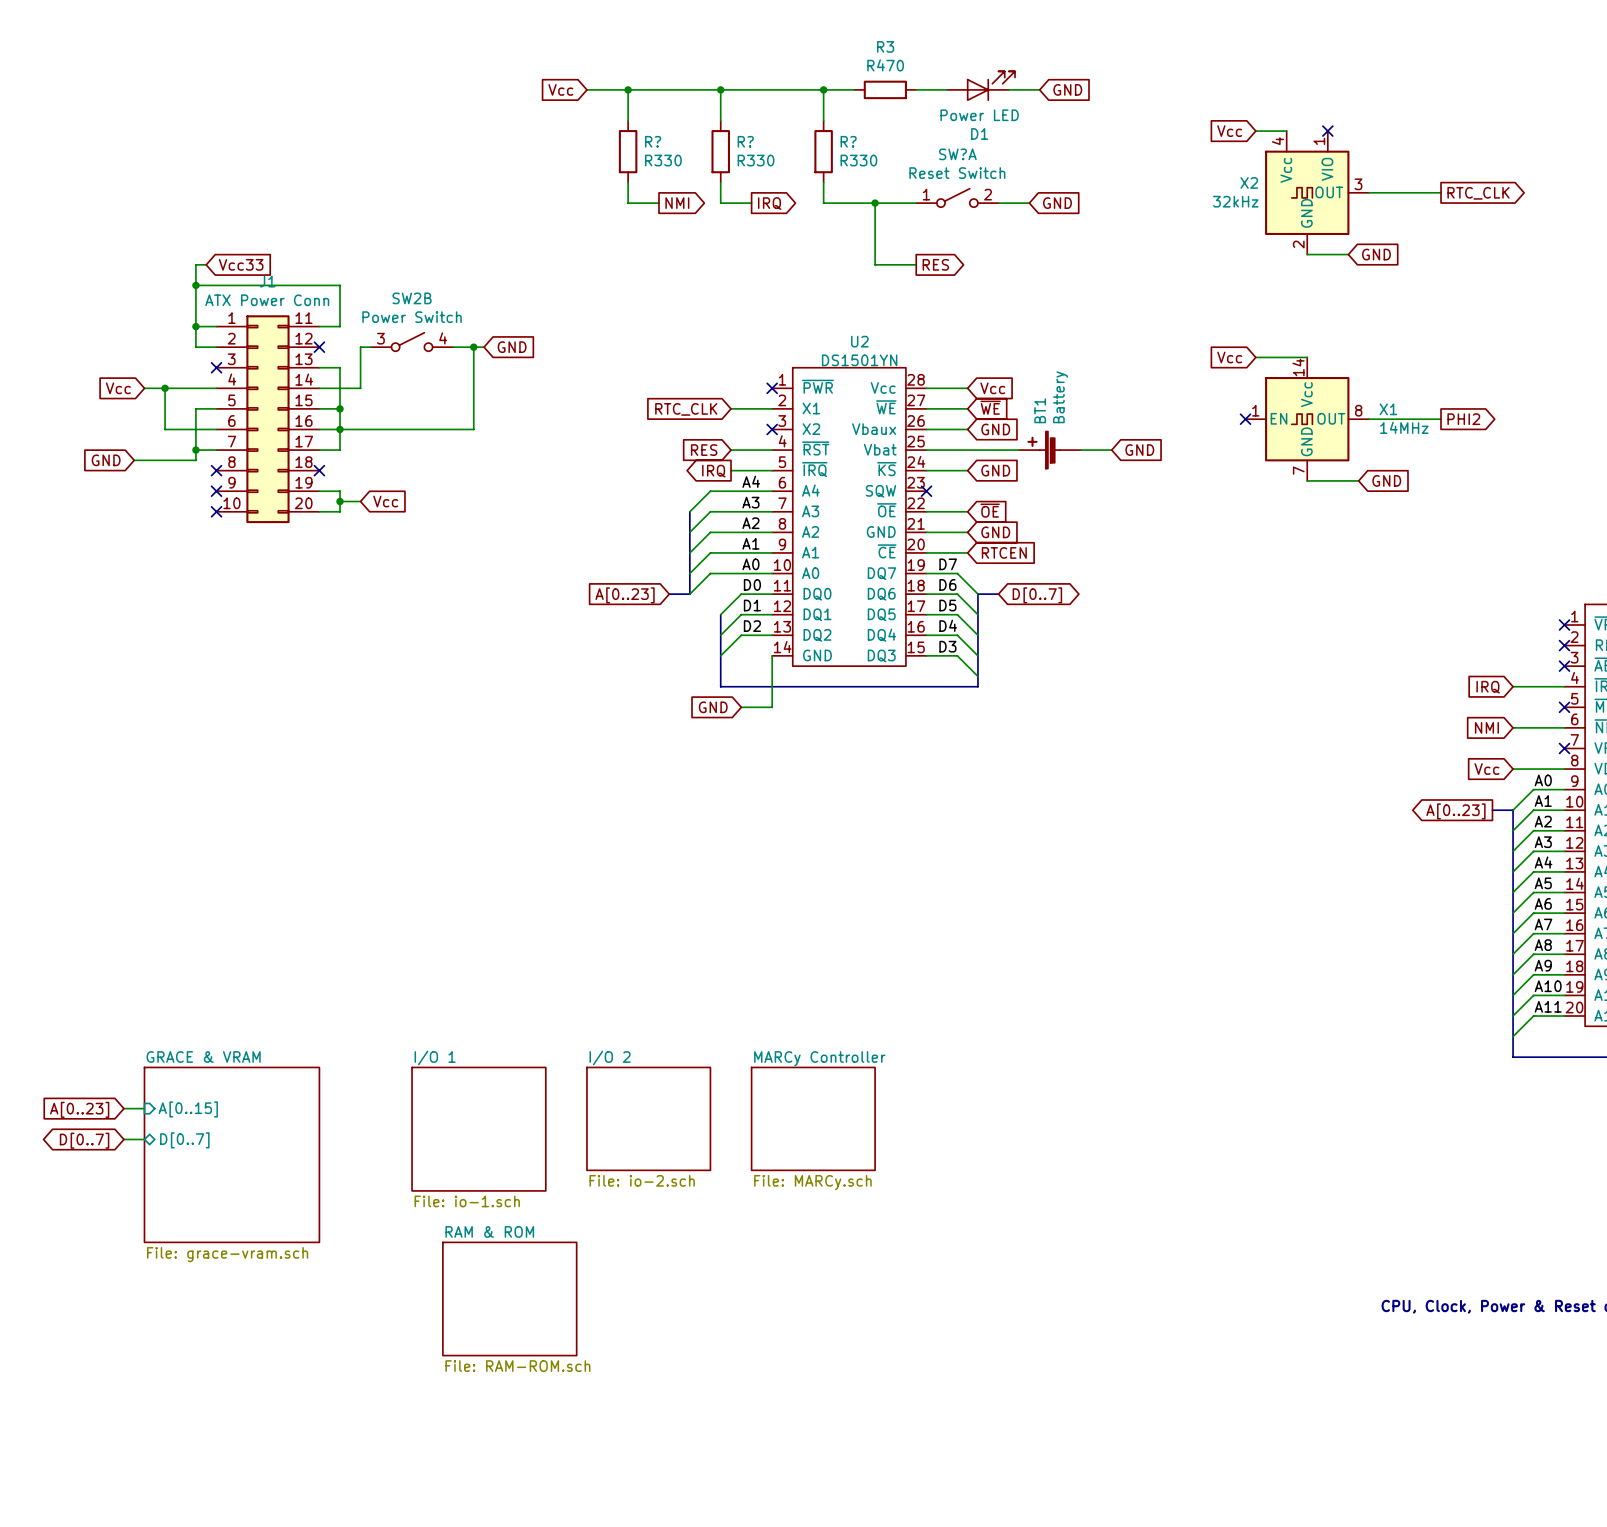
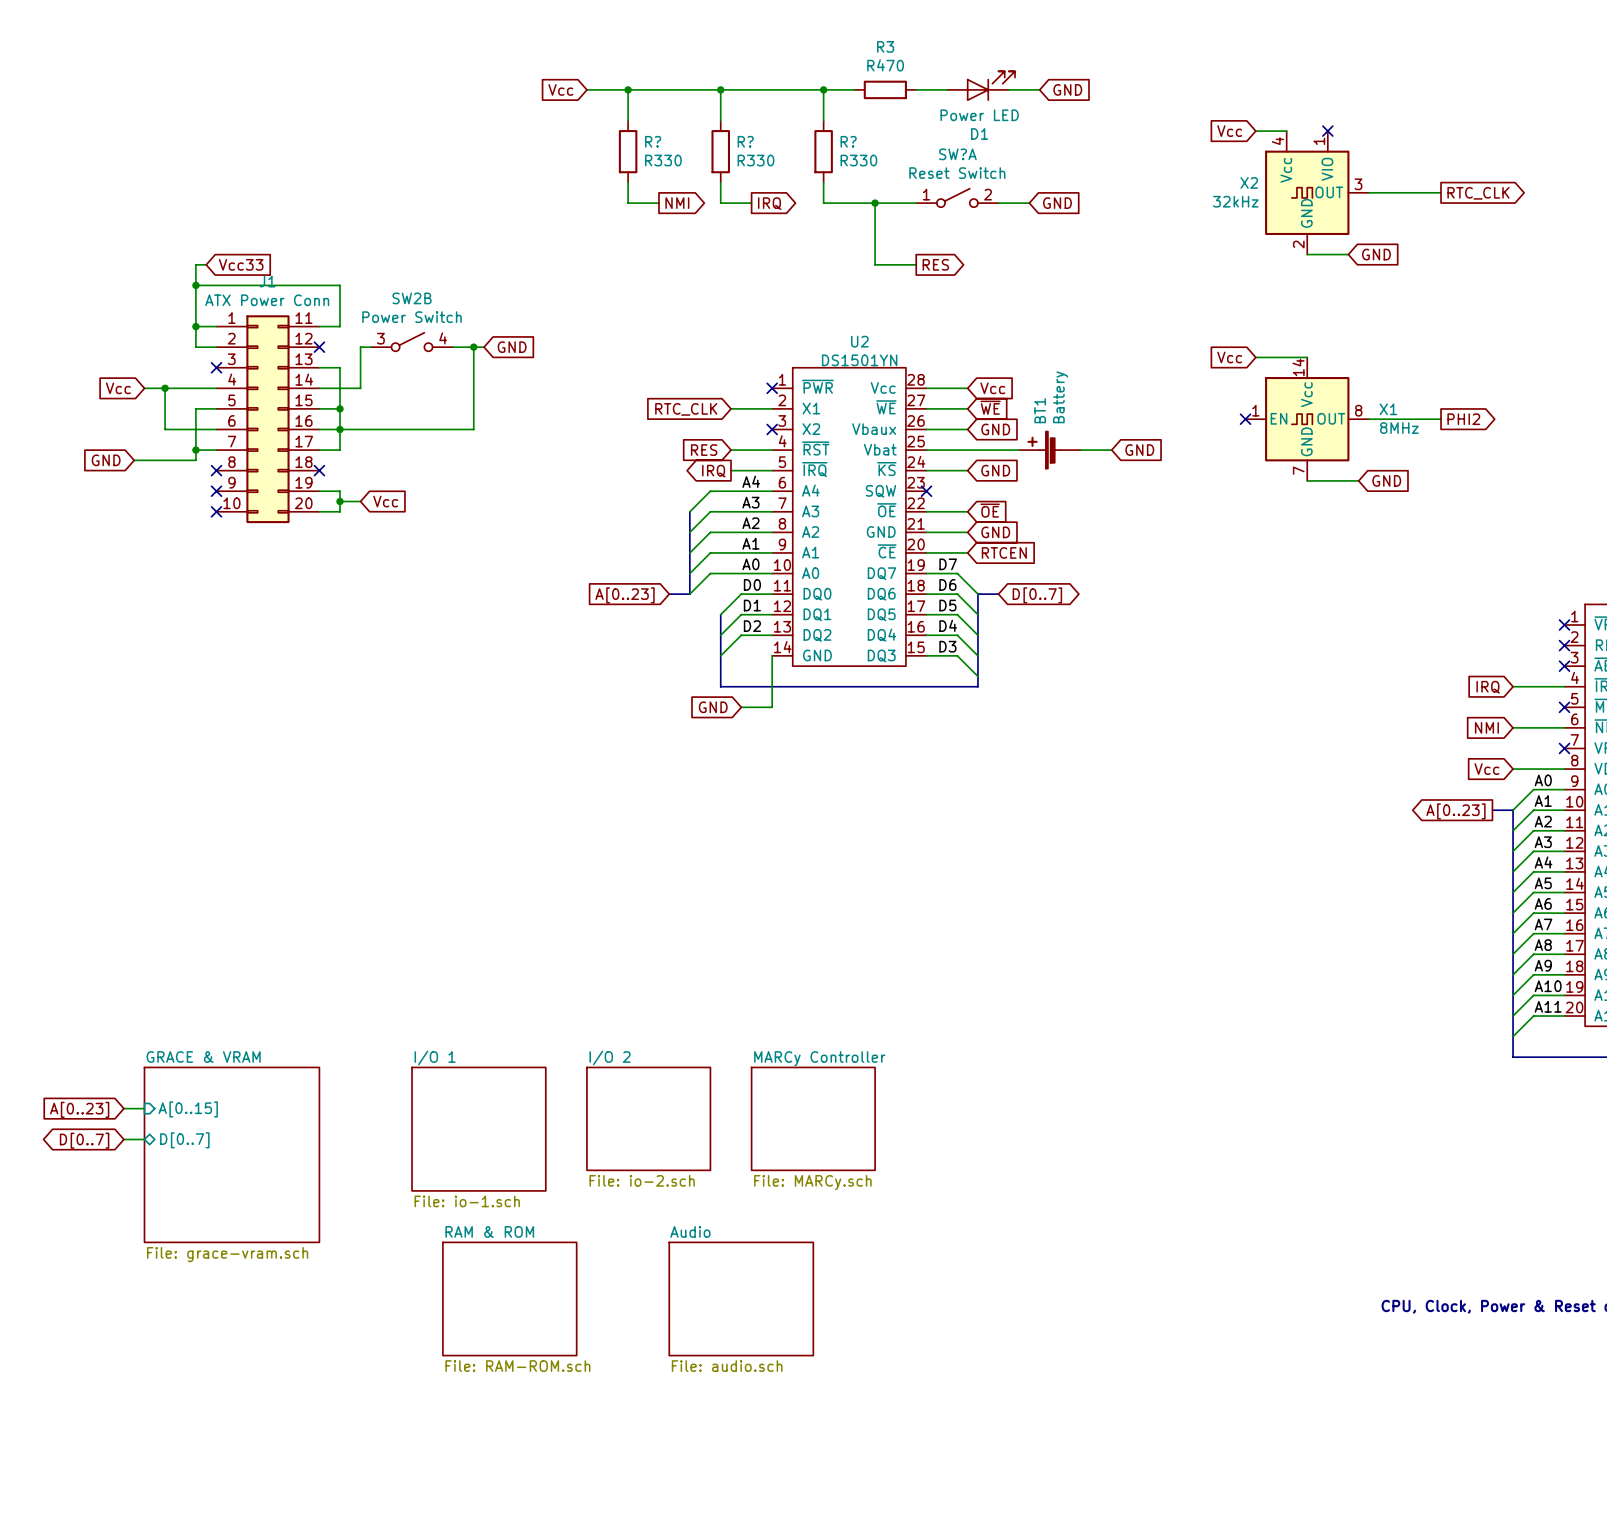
X1 value: 14MHz (1404, 427) -> 8MHz (1399, 428)
sheet Audio: none -> File: audio.sch (741, 1298)

